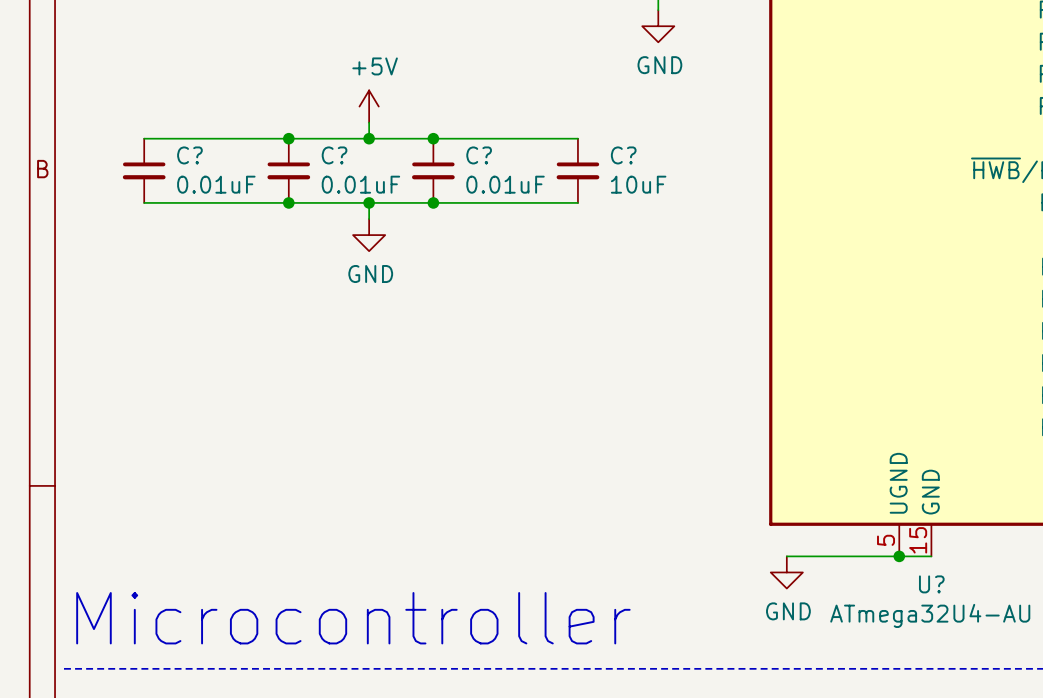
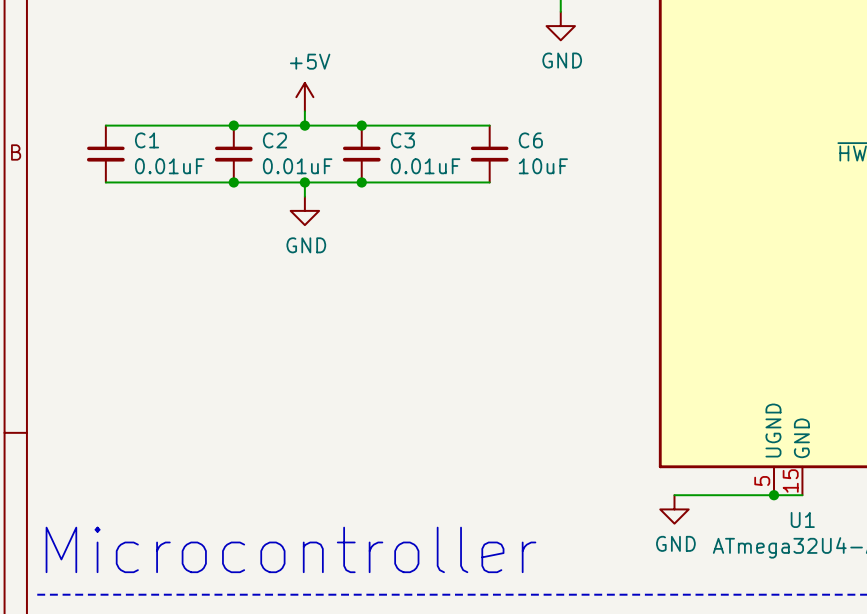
C? name: C? (189, 155) -> C1 (147, 140)
C? name: C? (334, 155) -> C2 (274, 140)
C? name: C? (479, 155) -> C3 (402, 140)
C? name: C? (623, 155) -> C6 (530, 140)
U? name: U? (931, 584) -> U1 (802, 519)

